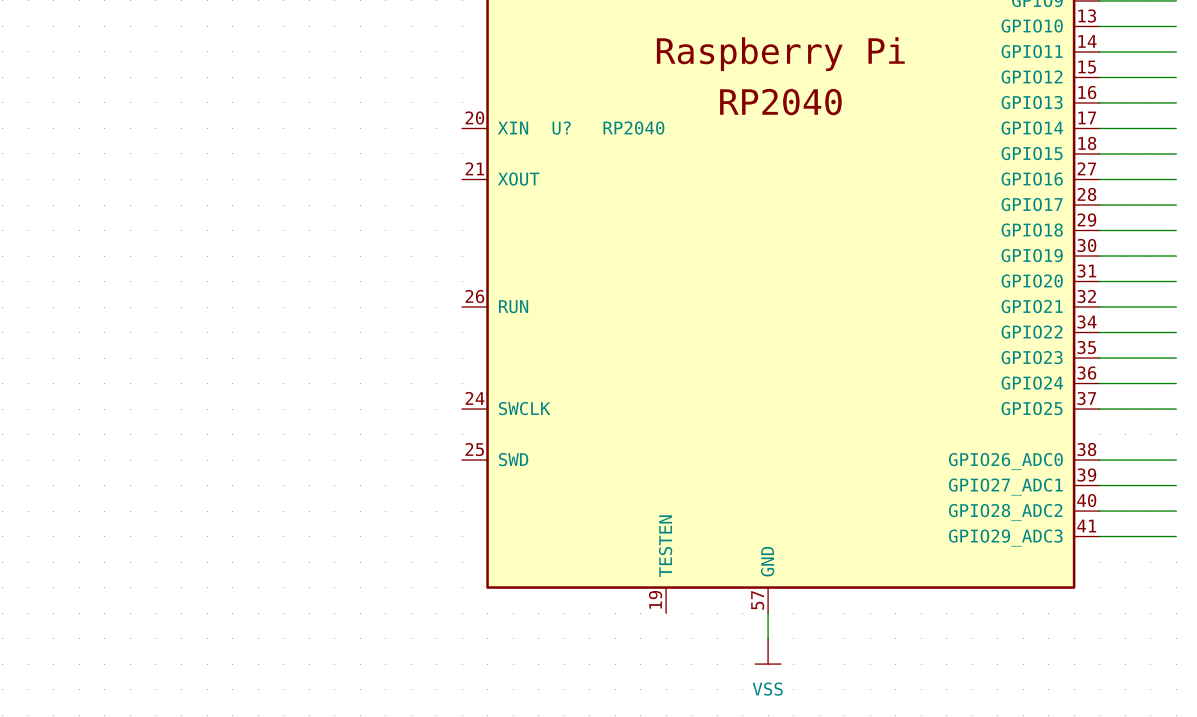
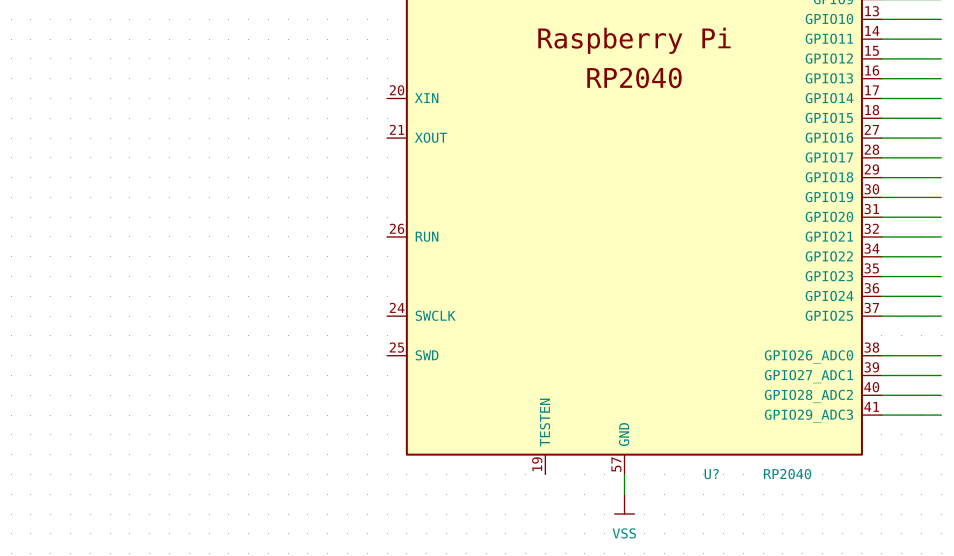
U? name position: U? (561, 128) -> U? (711, 474)
U? value position: RP2040 (633, 128) -> RP2040 (787, 474)

